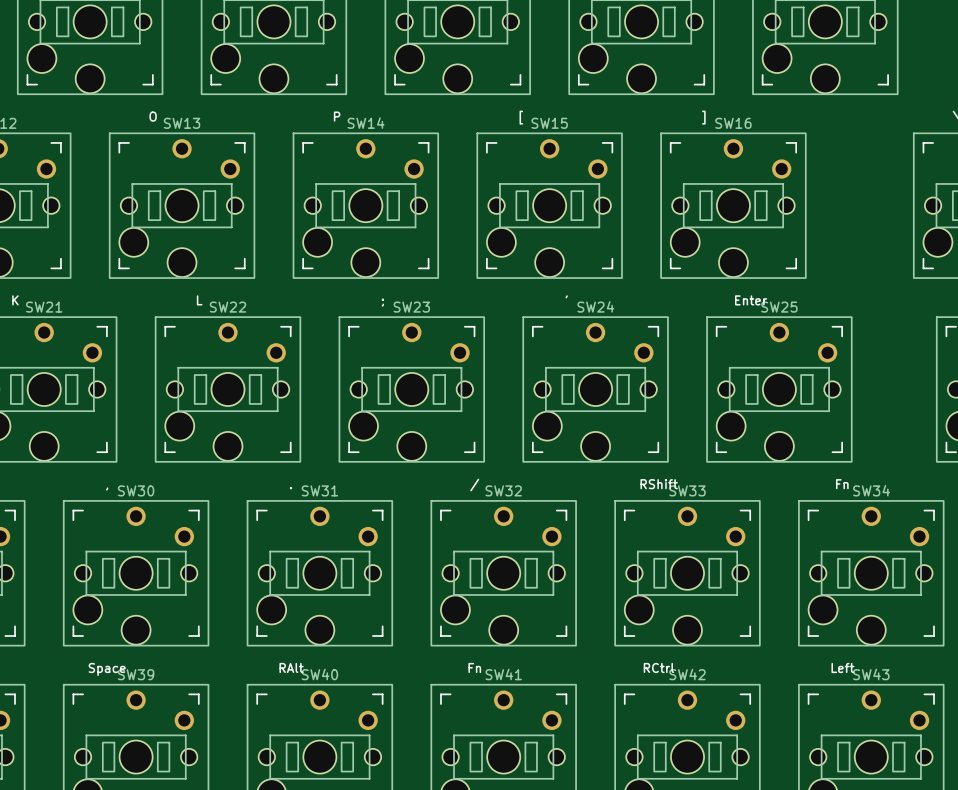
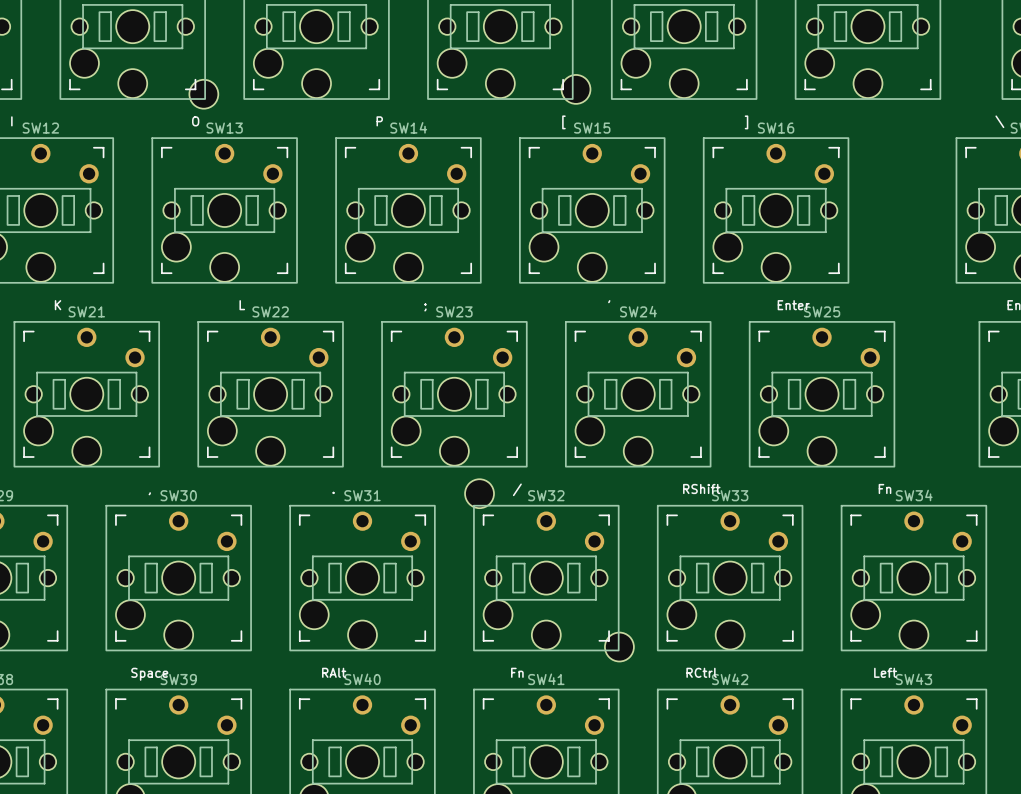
part: none -> (576, 89)
part: none -> (203, 94)
part: none -> (479, 493)
part: none -> (619, 647)

